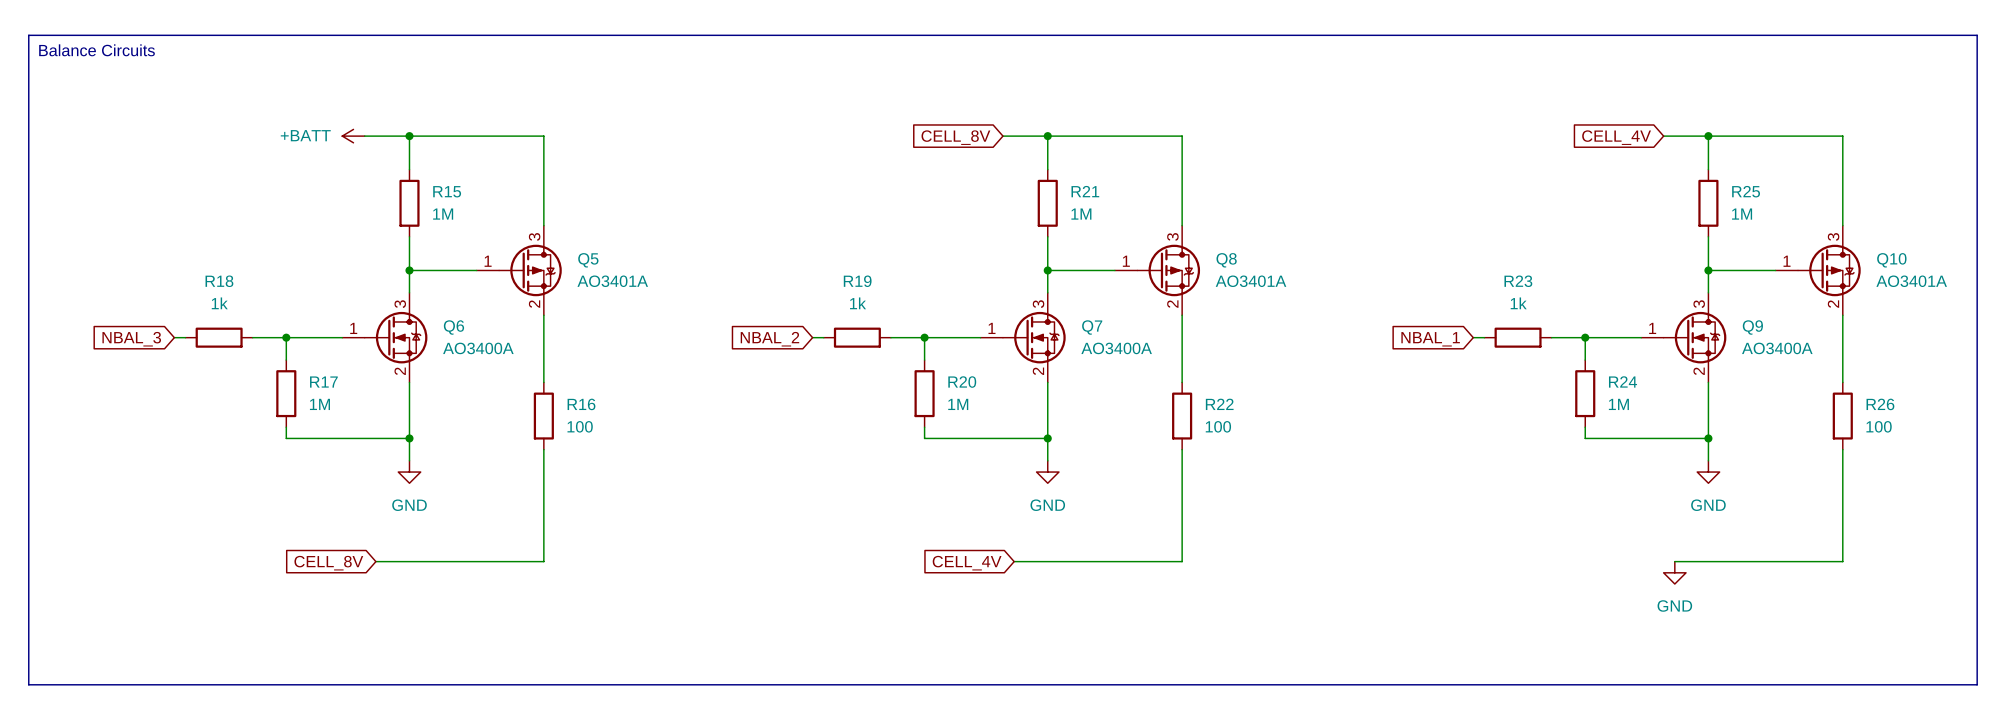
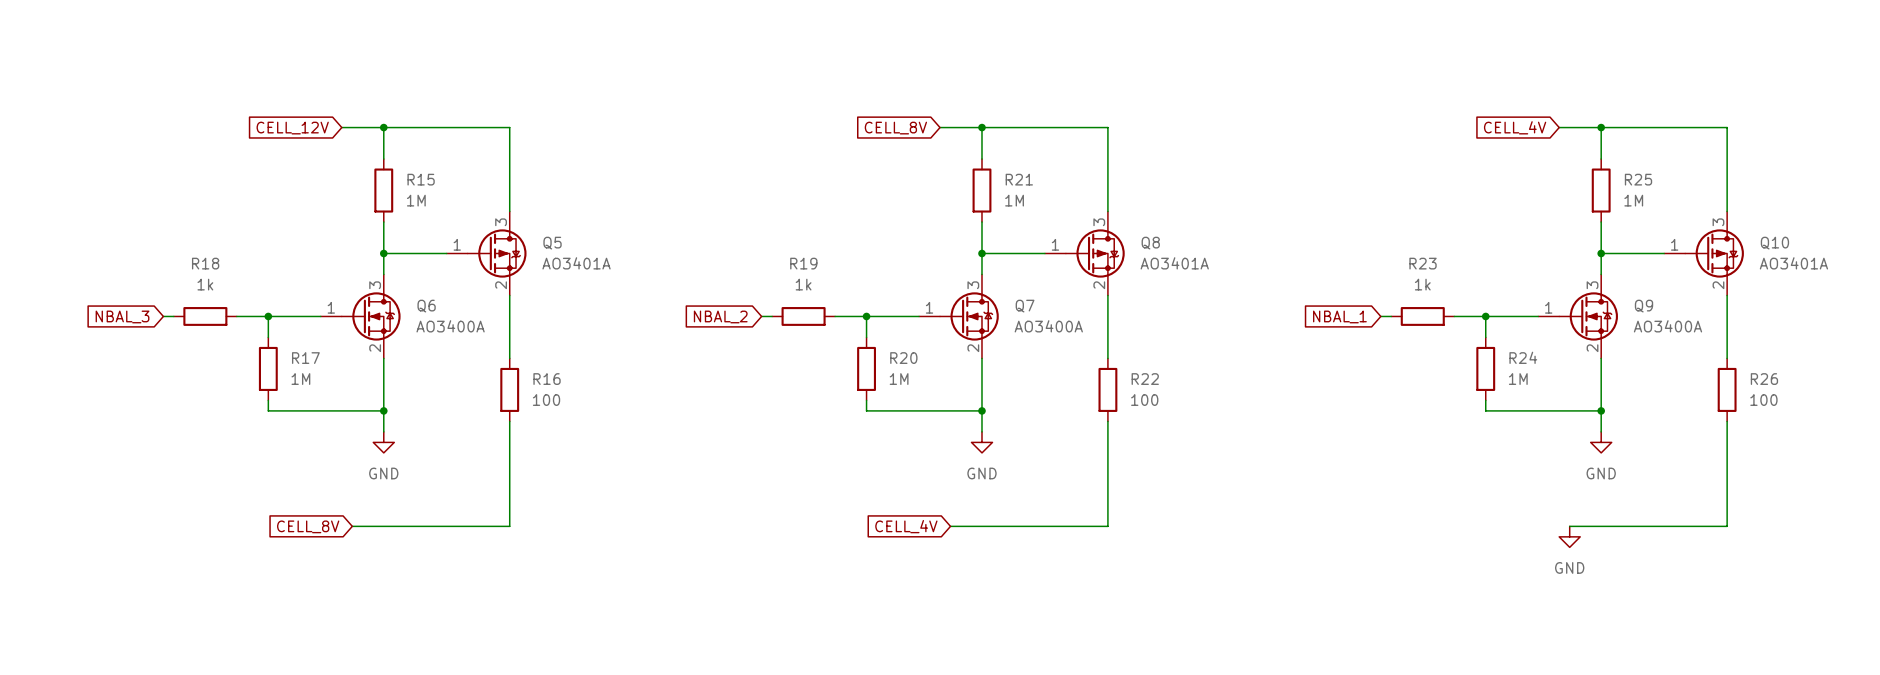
line: (28, 35) (1977, 35) (1977, 684) (28, 684) (28, 35) -> none
text: Balance Circuits (97, 50) -> none
power symbol: +BATT (353, 136) -> none
global label: none -> CELL_12V (292, 128)

